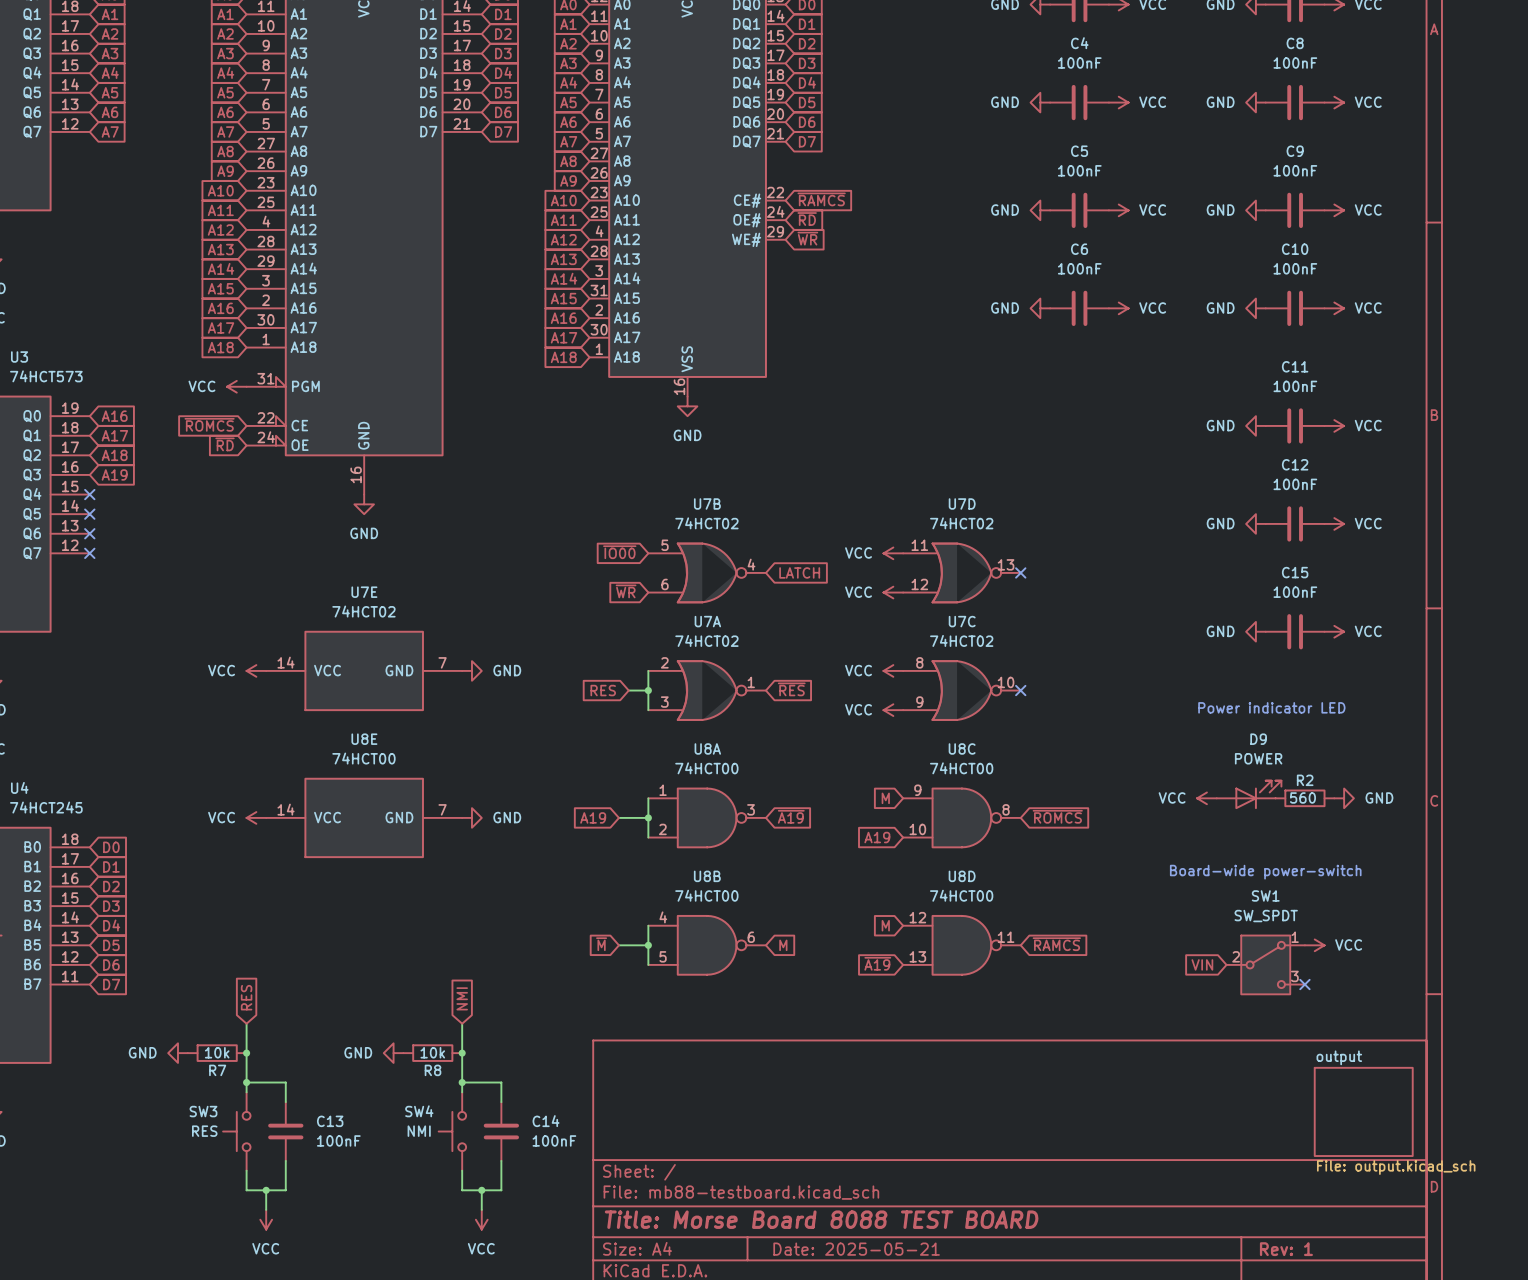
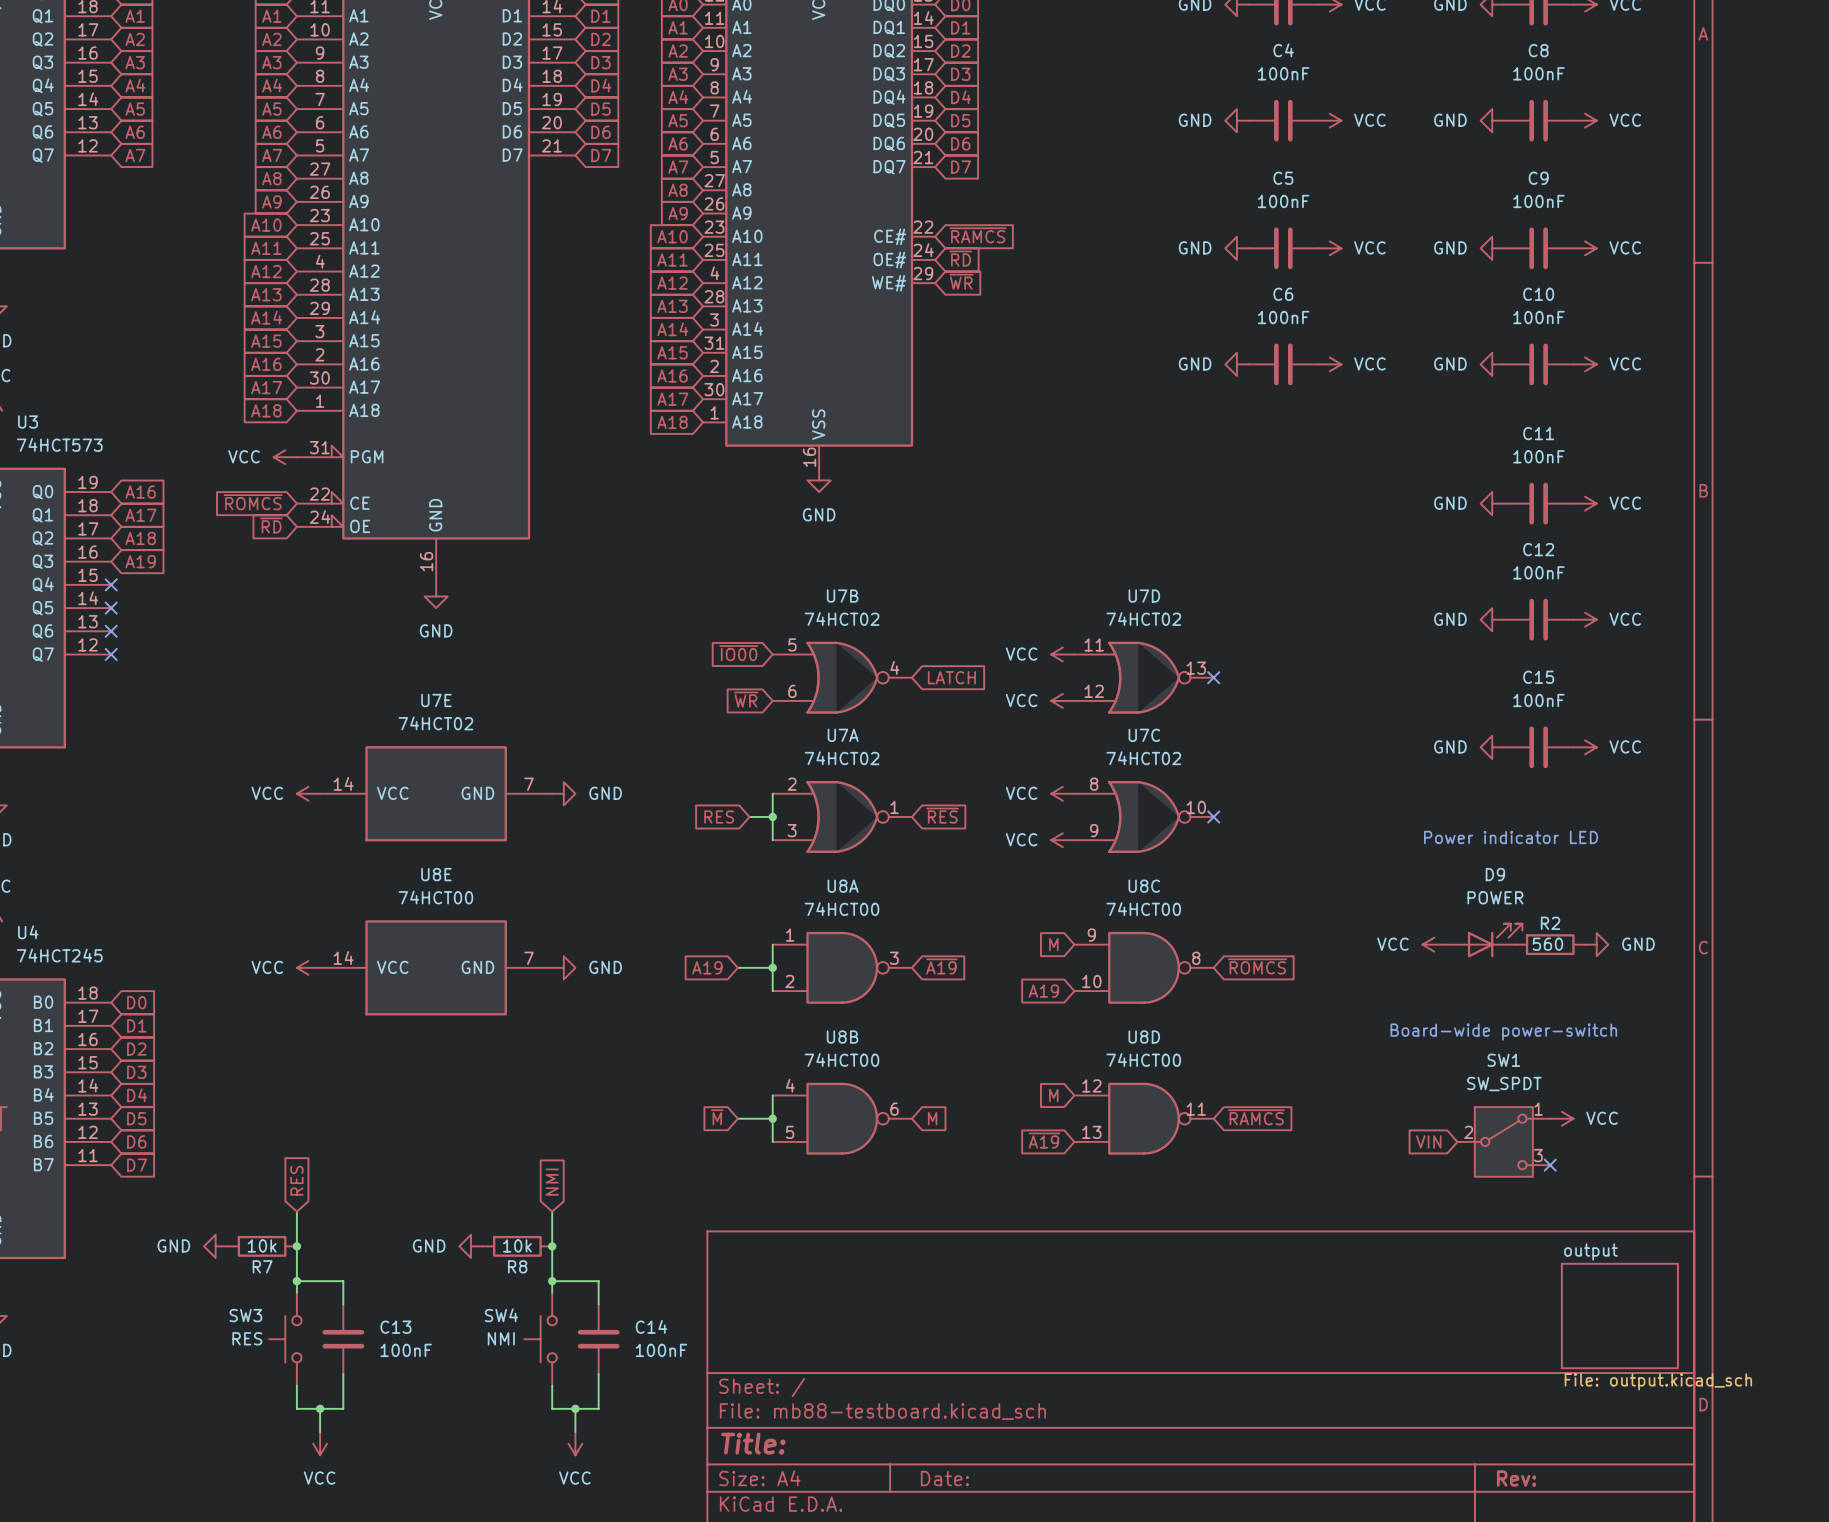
title block: Title: Morse Board 8088 TEST BOARD (821, 1219) -> Title: (753, 1443)
title block: Date: 2025-05-21 (856, 1249) -> Date: (944, 1478)
title block: Rev: 1 (1286, 1249) -> Rev: (1516, 1478)

